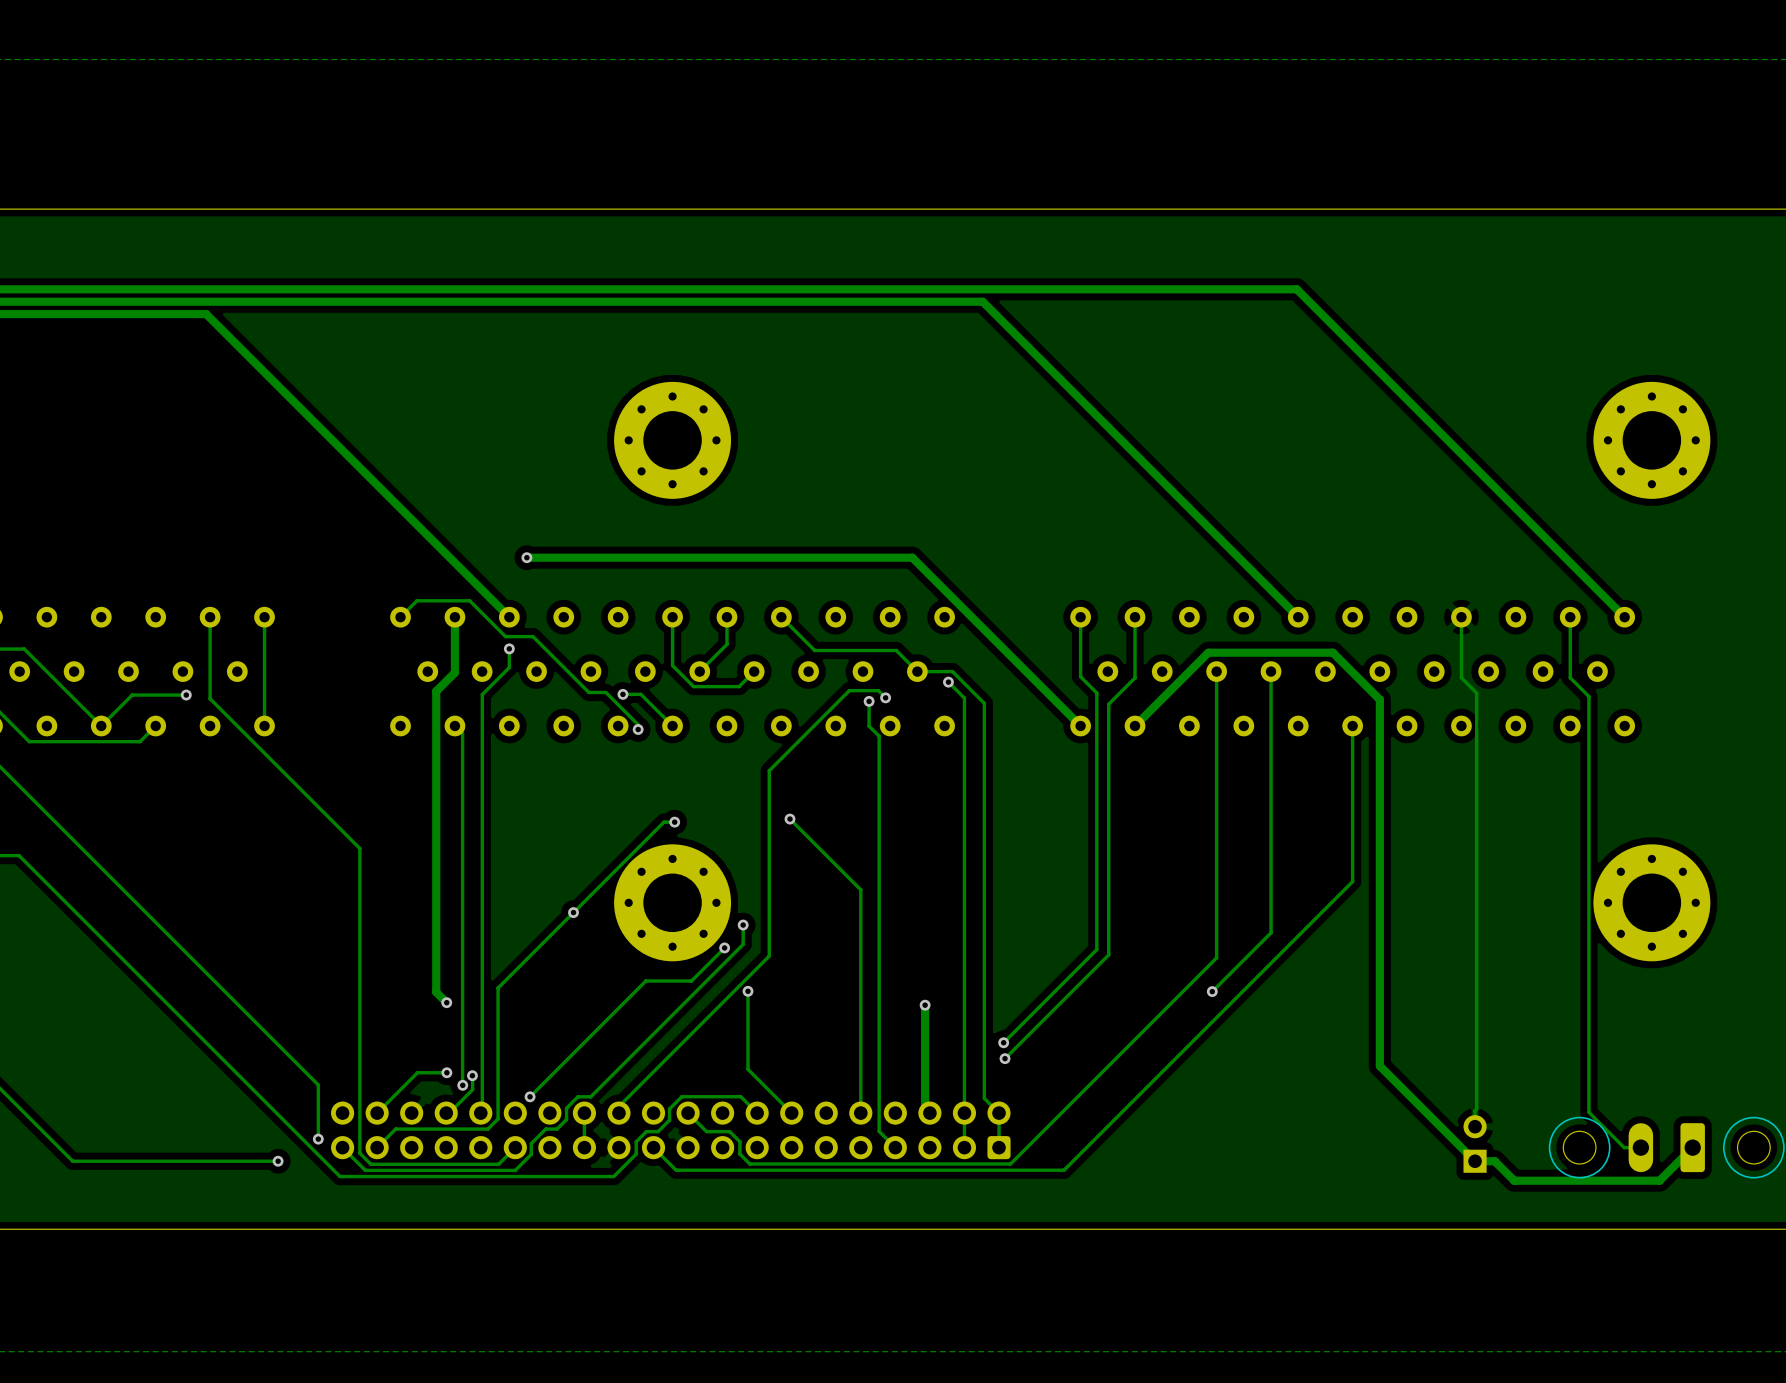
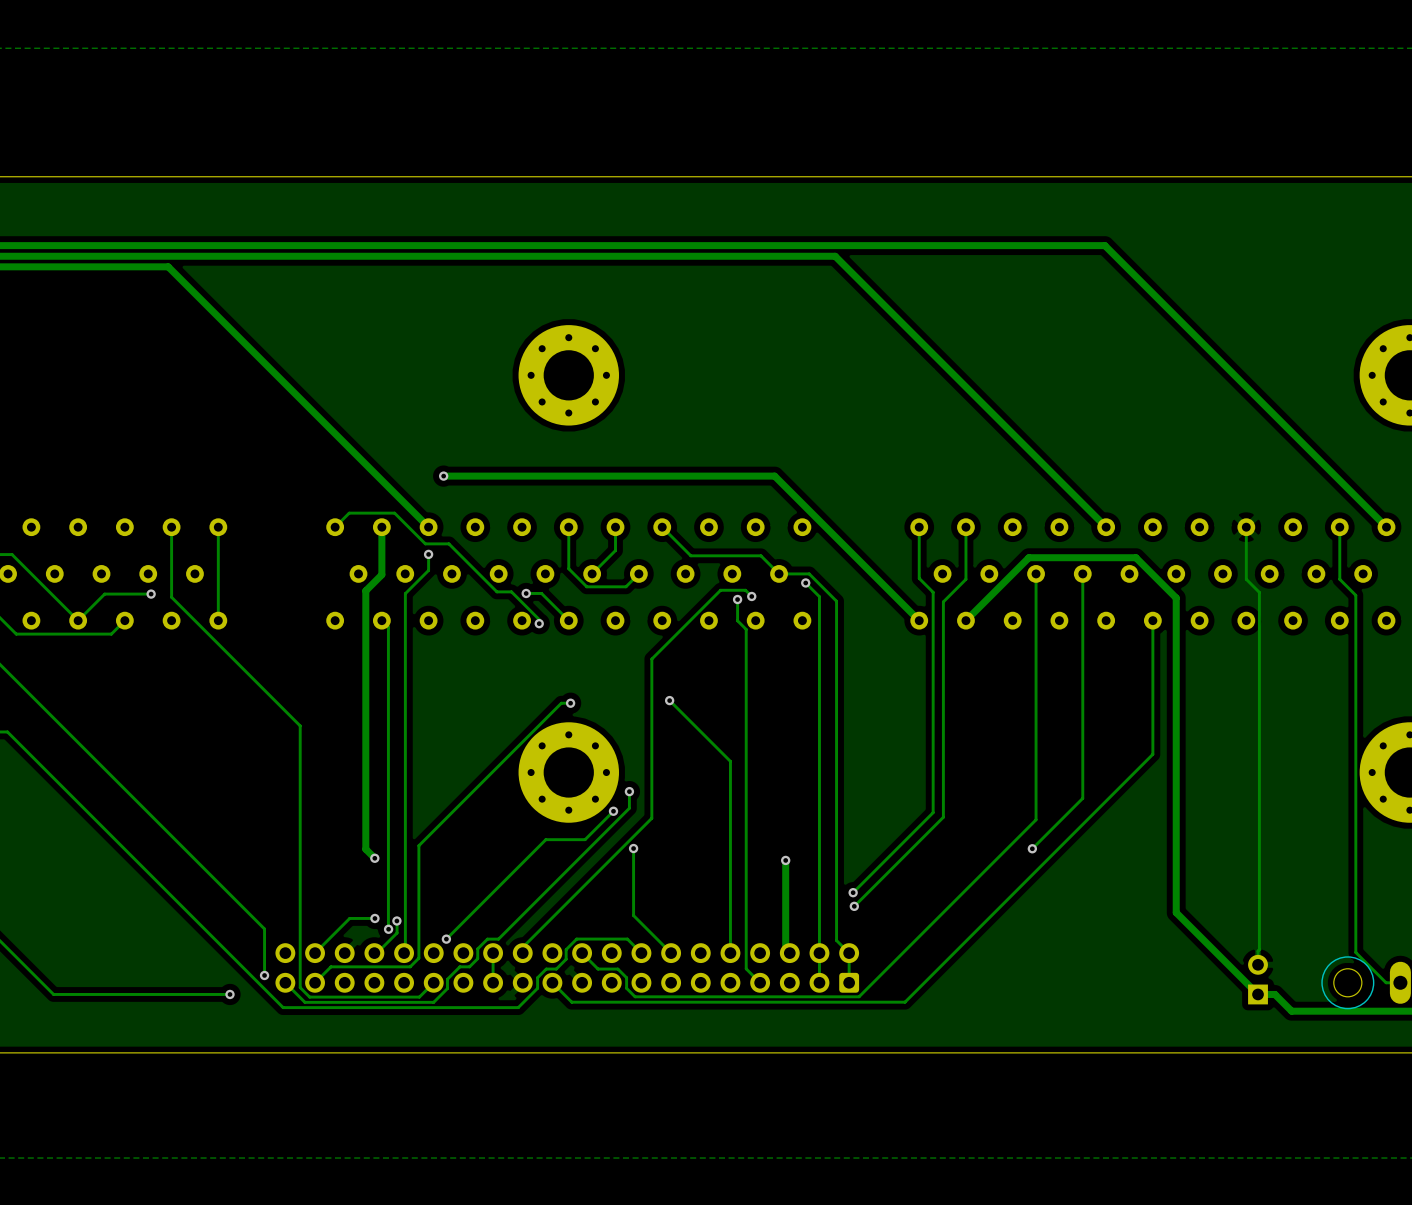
via: (573, 912) -> none

